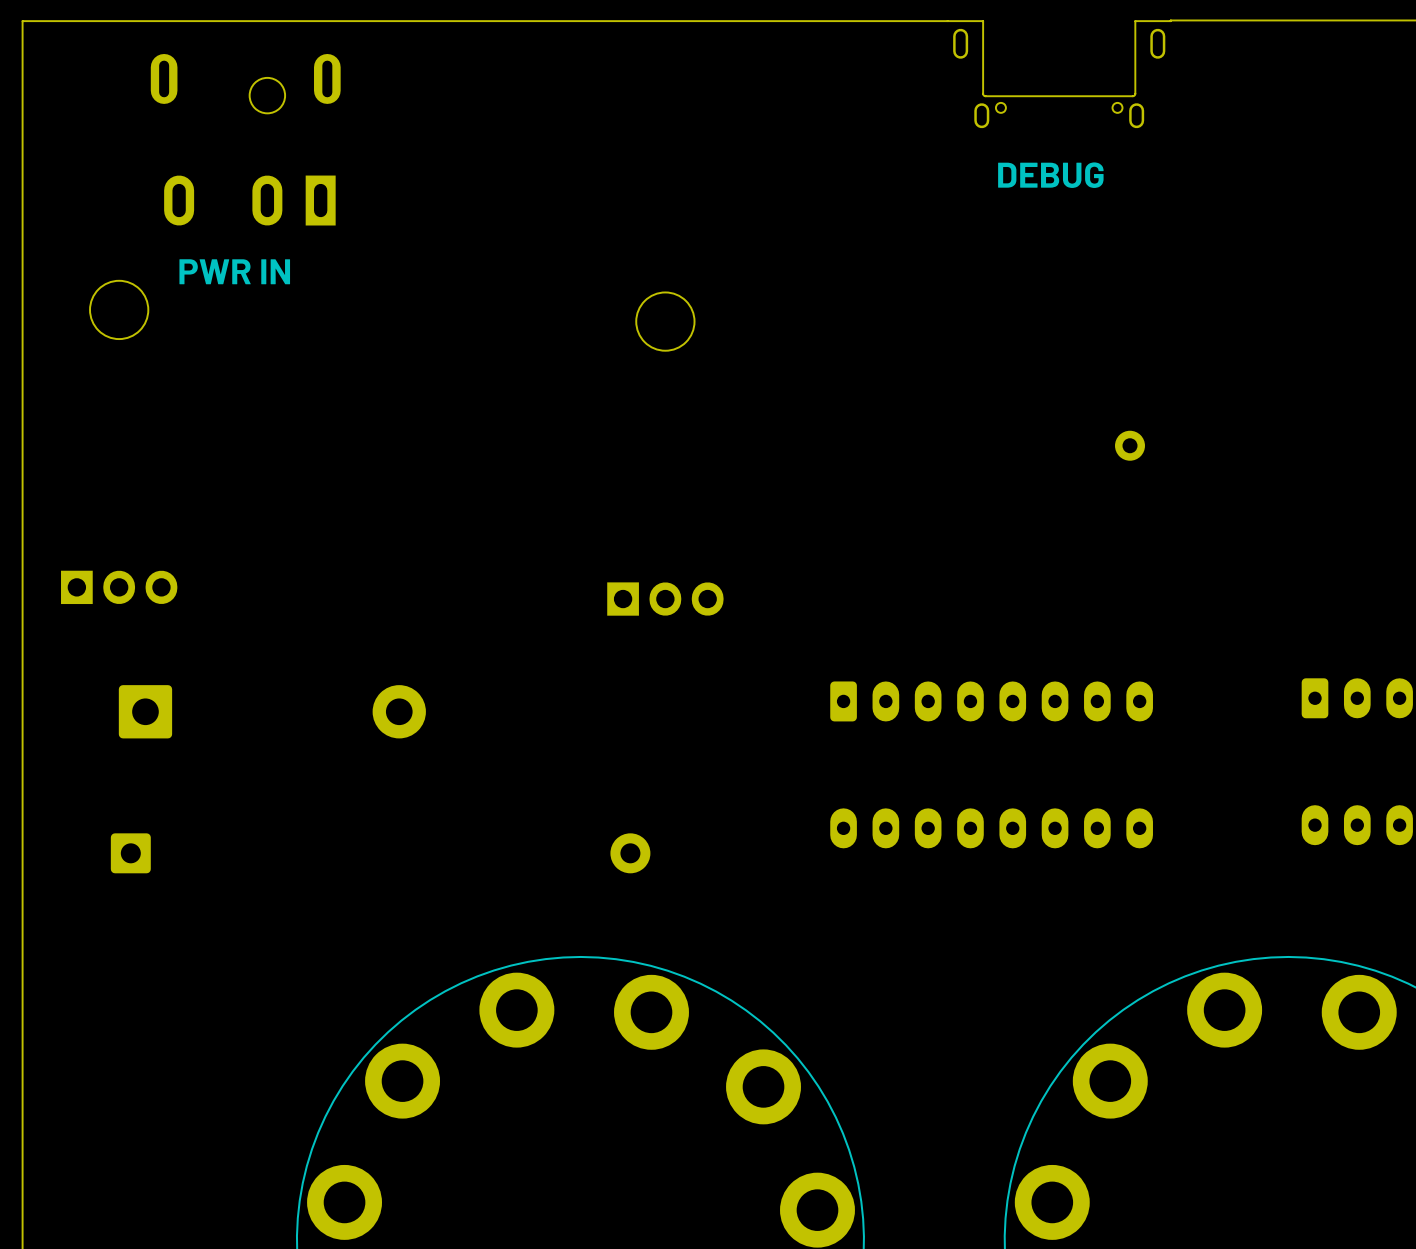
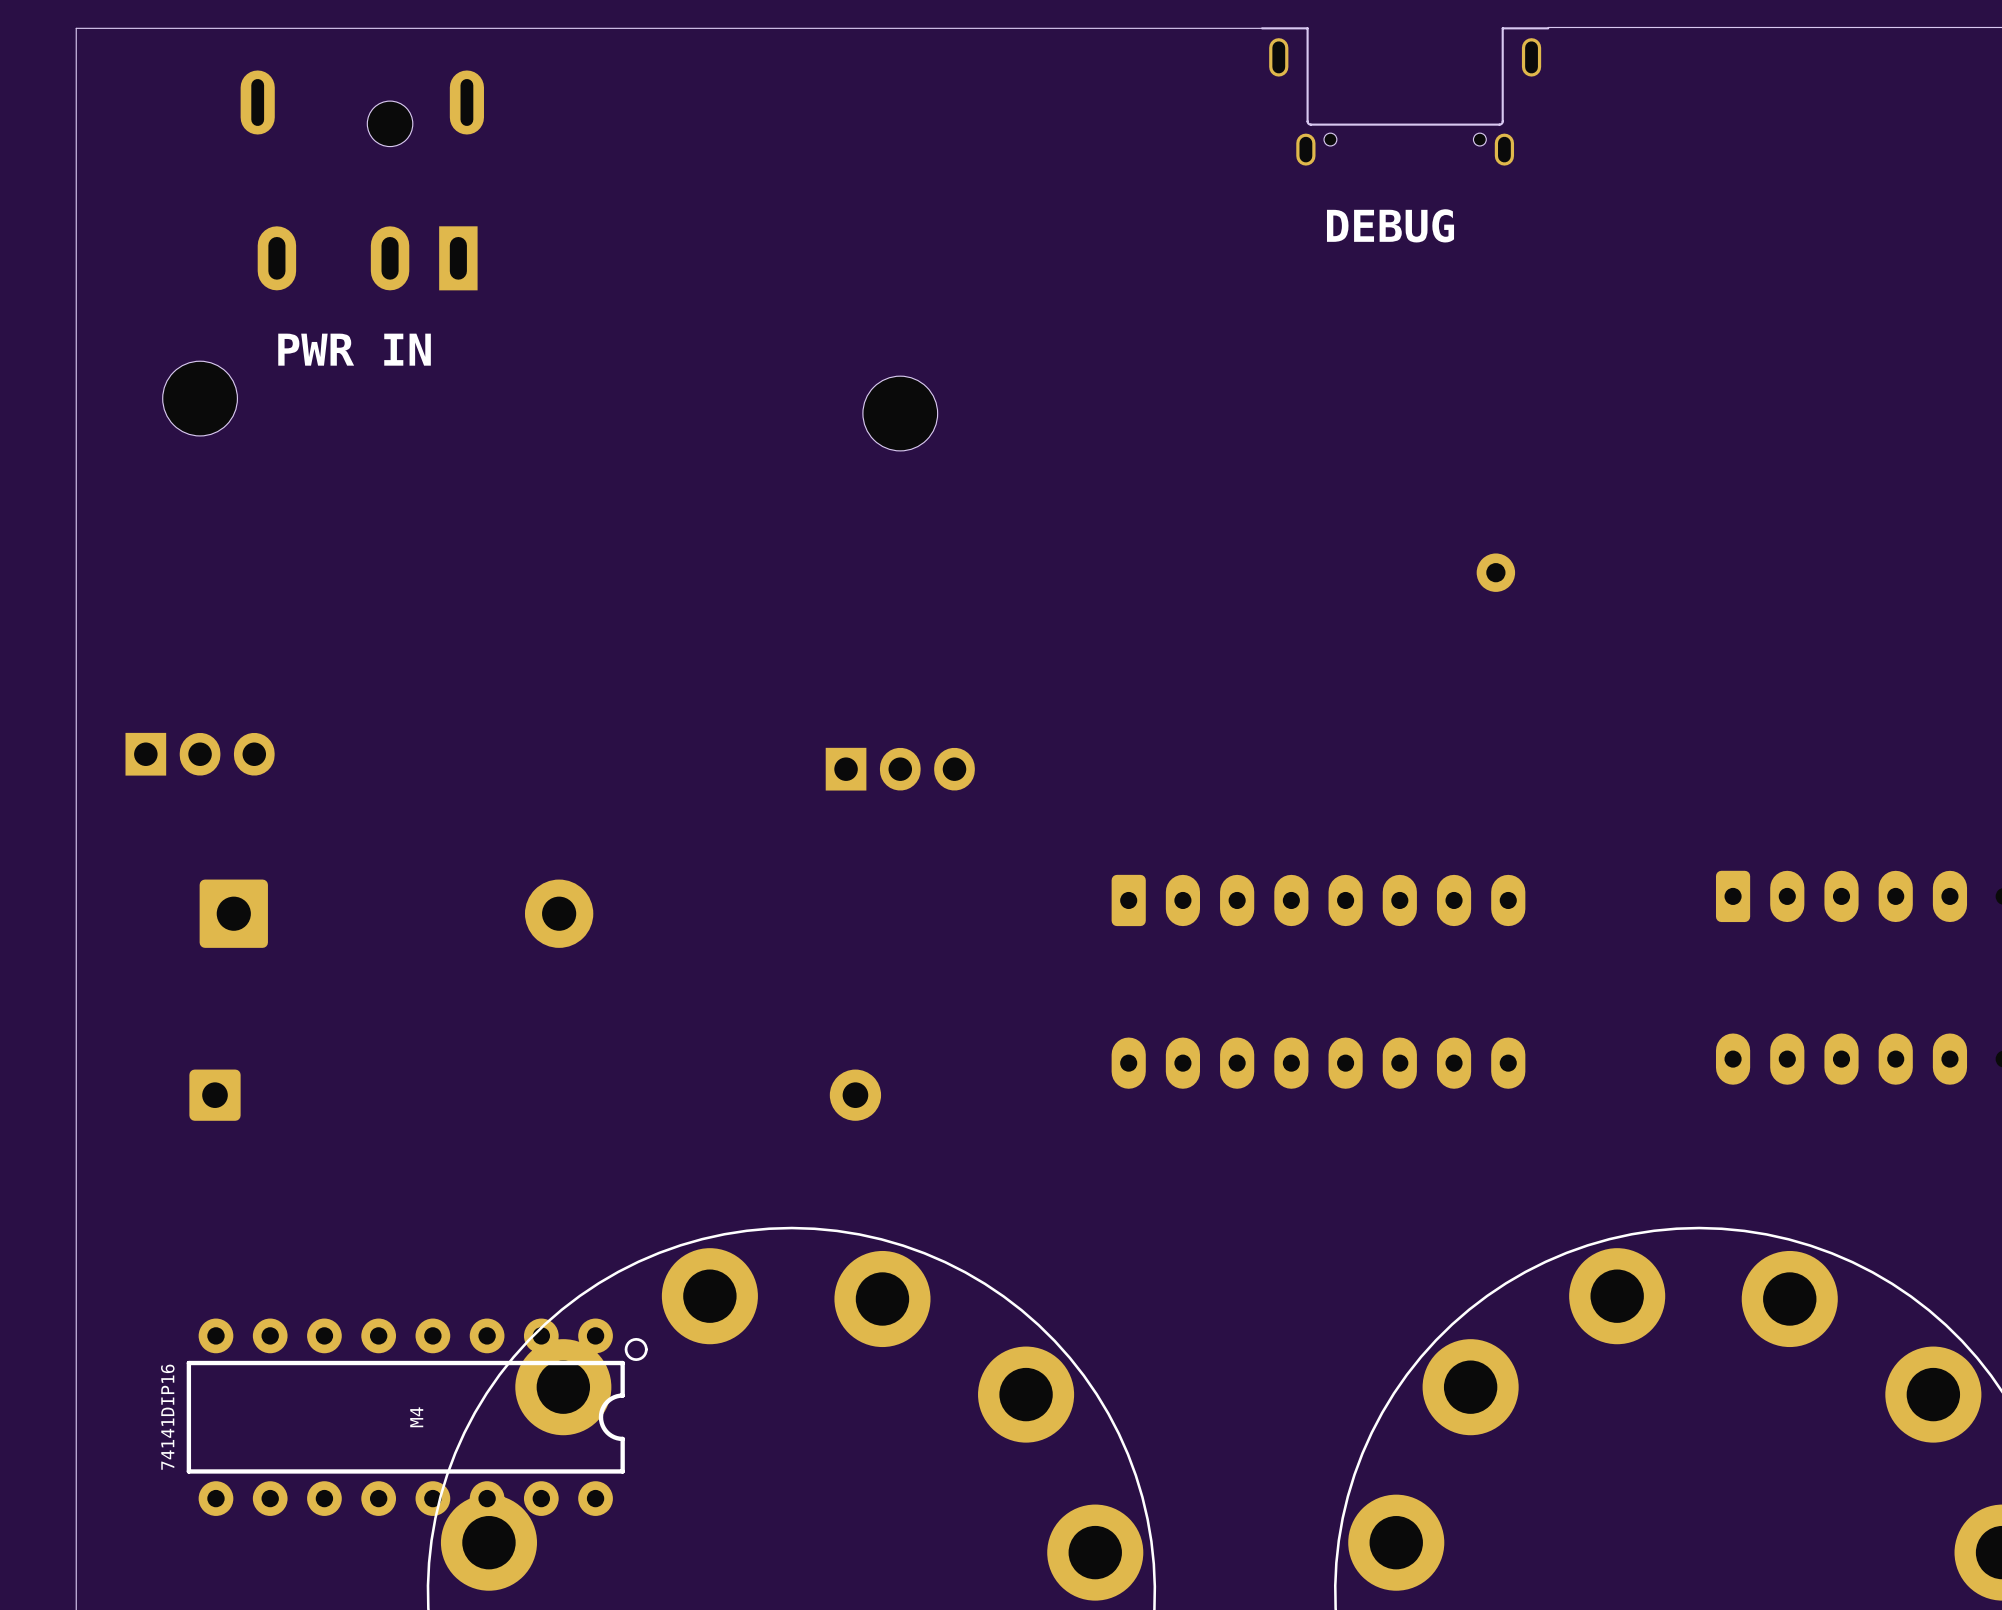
M4: none -> 74141DIP16 (417, 1417)

